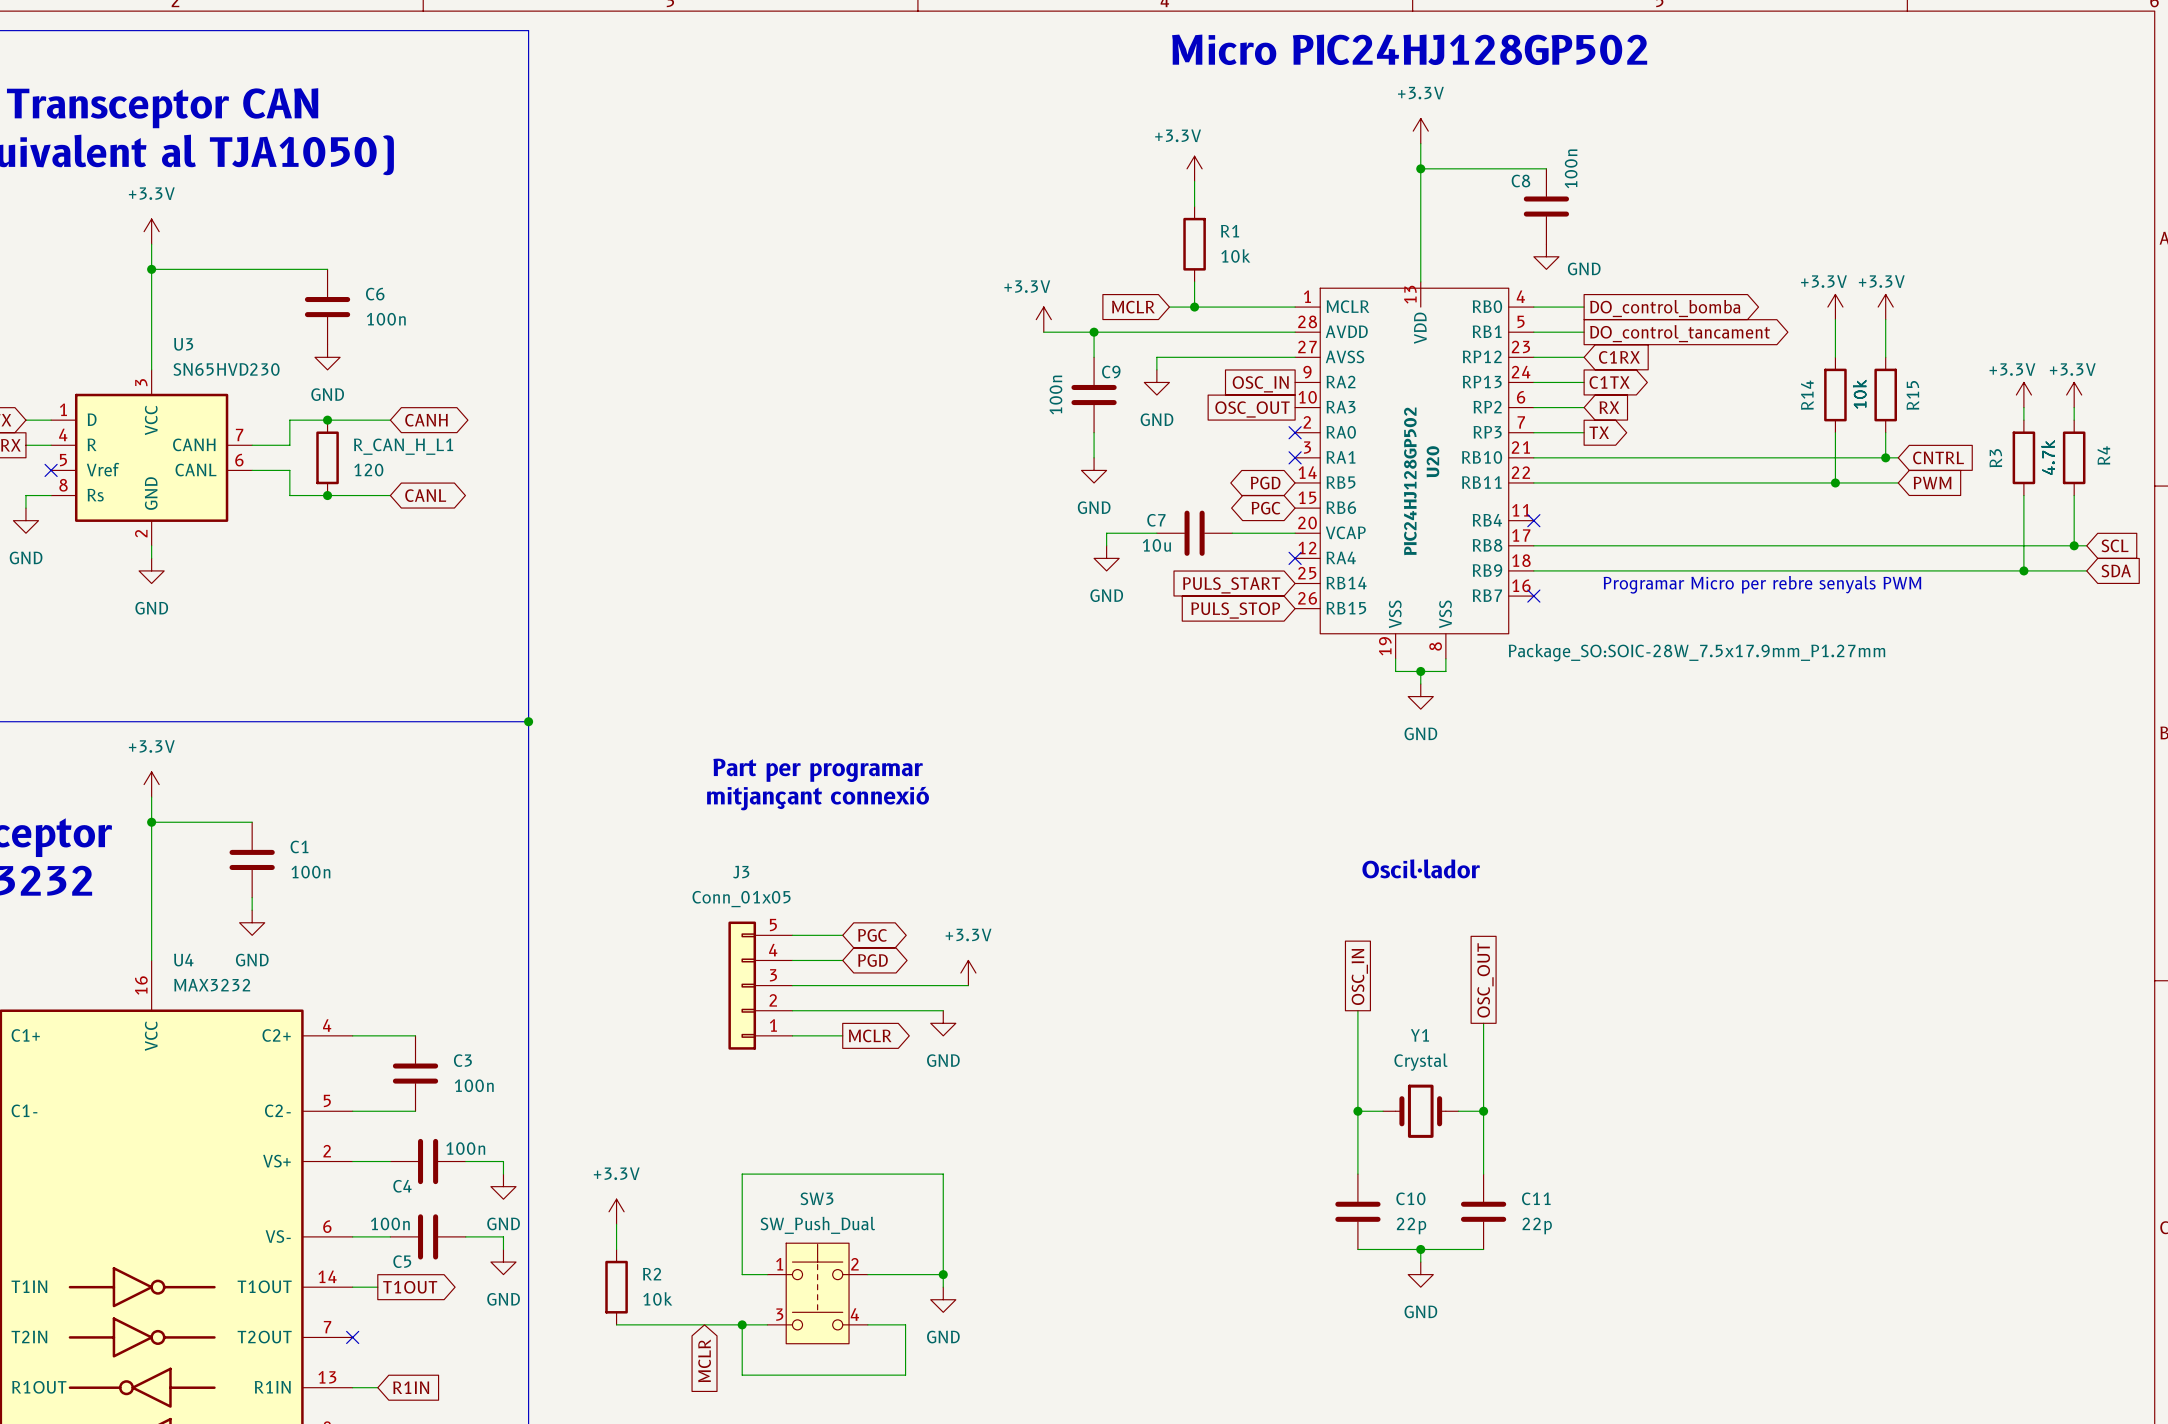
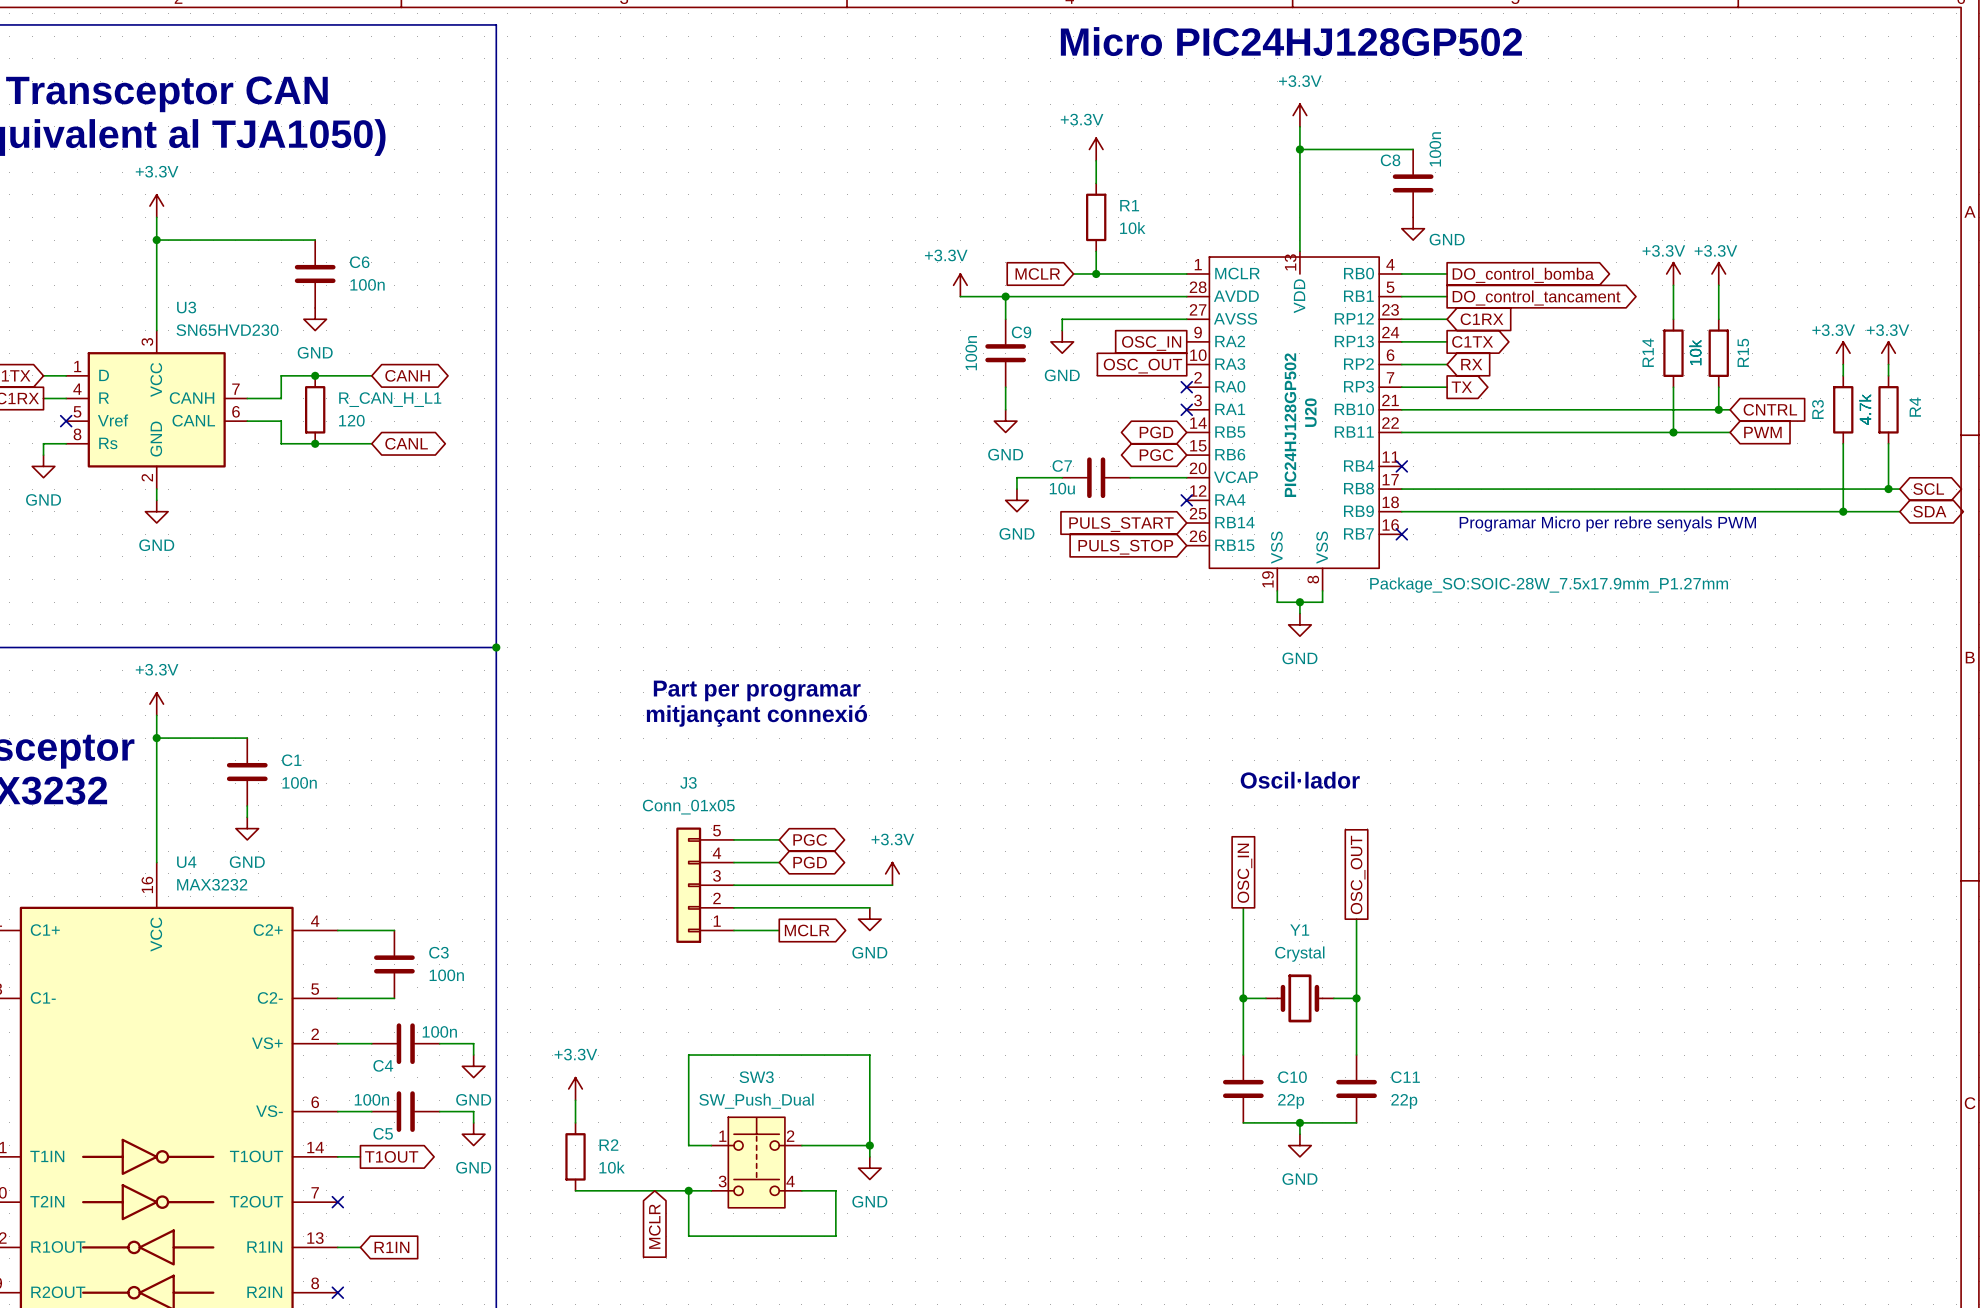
global label shape: input (2115, 545) -> bidirectional (1928, 489)
global label shape: input (2116, 571) -> bidirectional (1929, 511)

